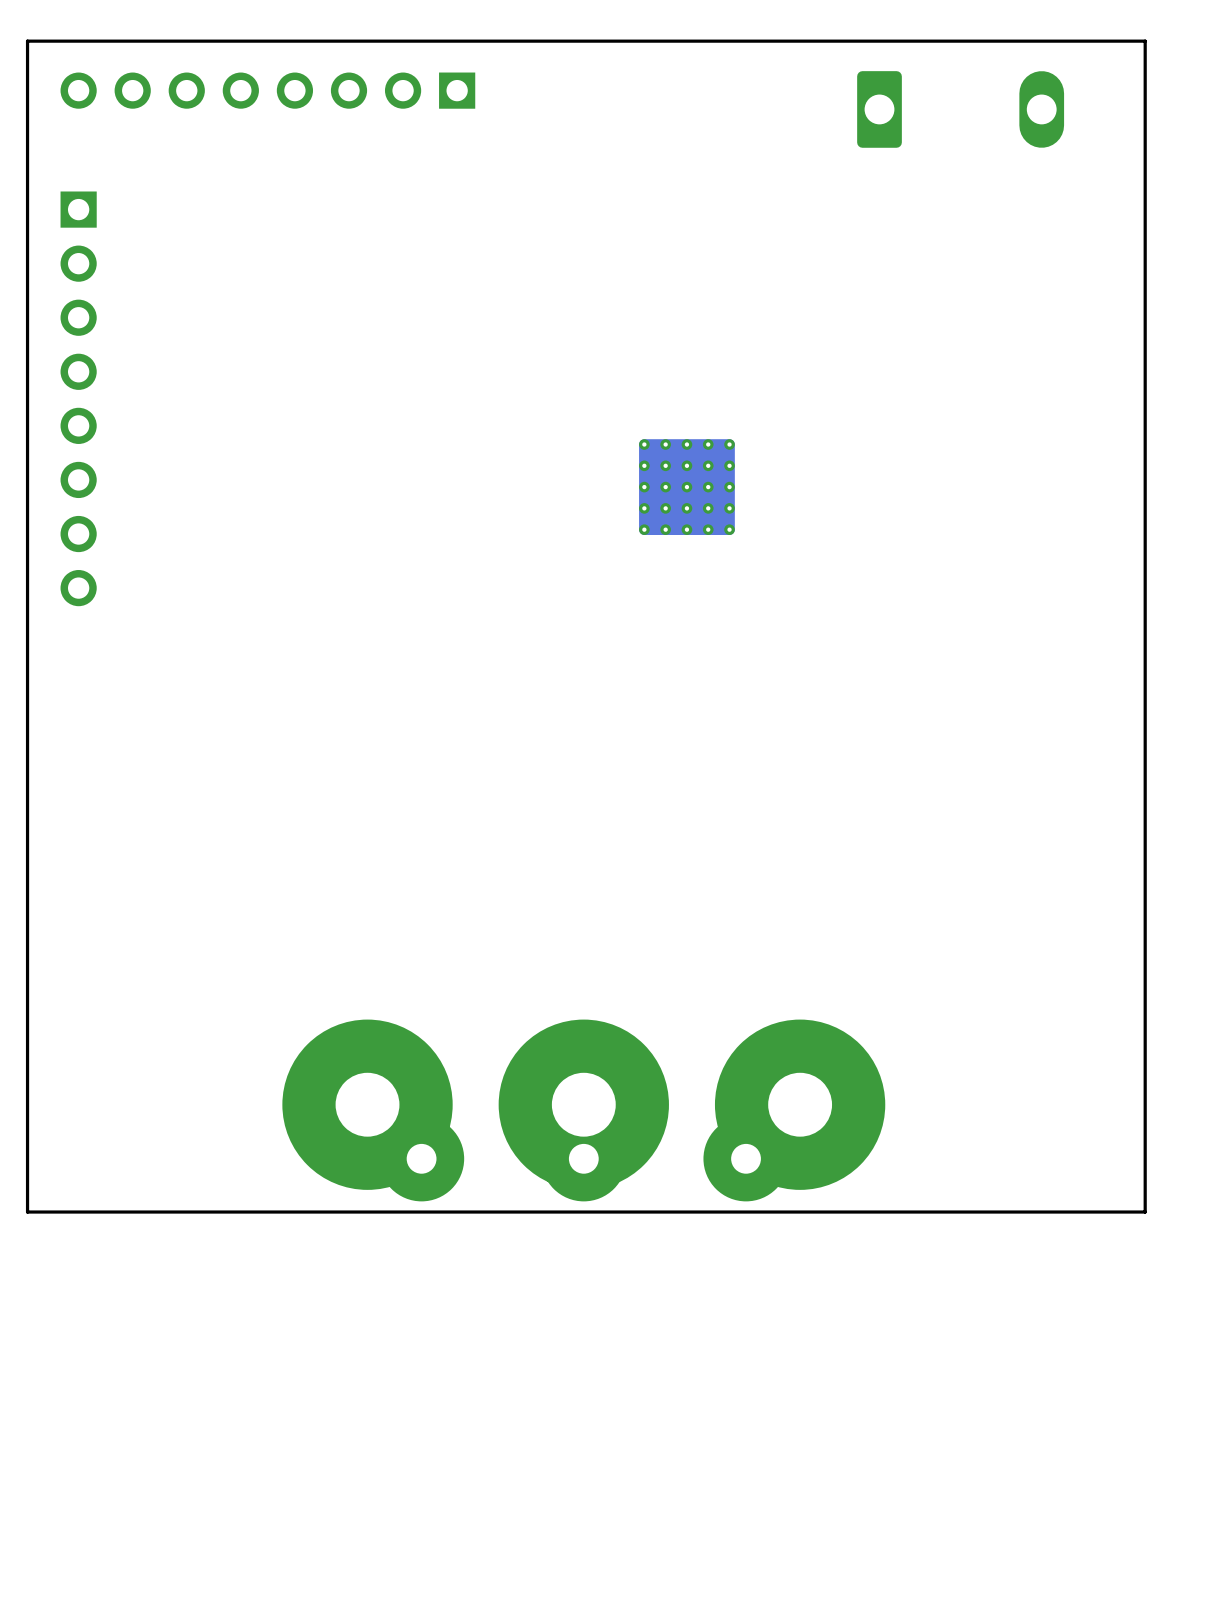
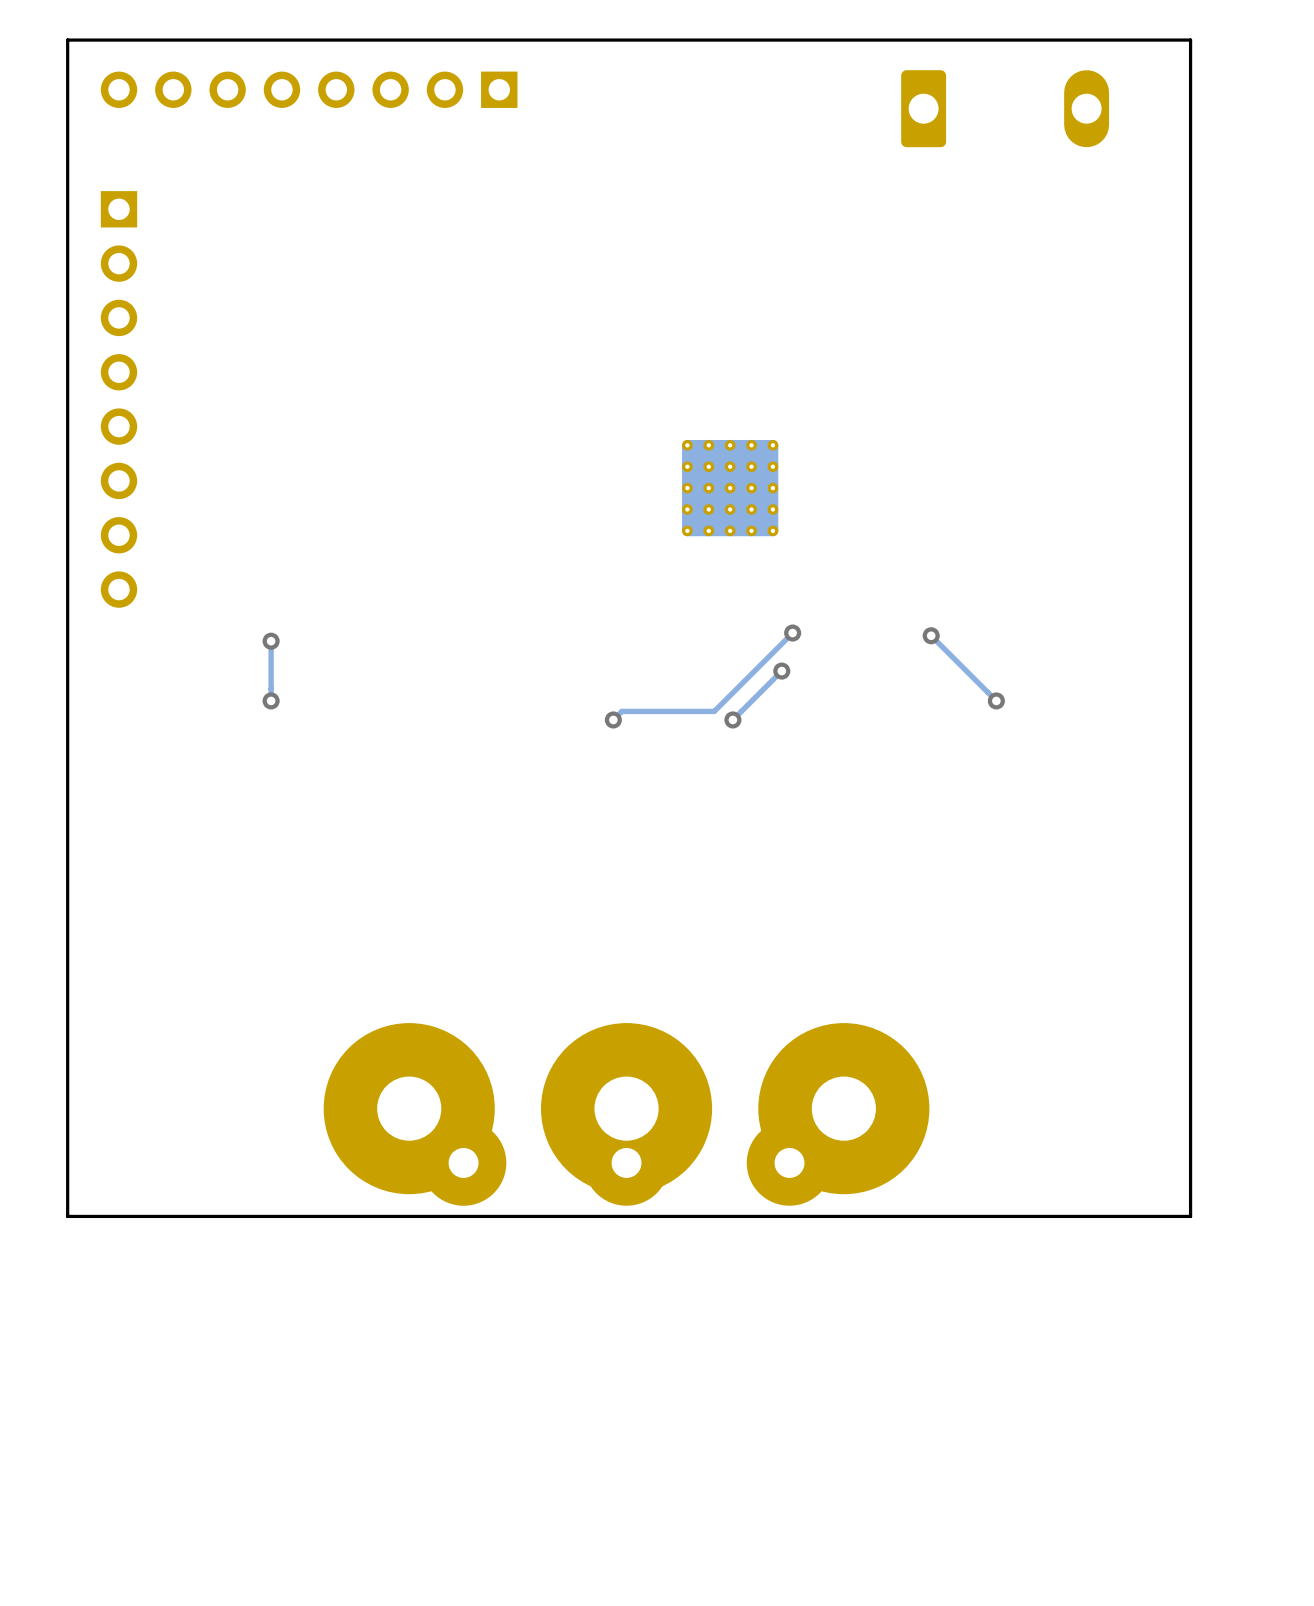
track: none -> (792, 633) (714, 711) (621, 711) (613, 719)
via: none -> (792, 633)
track: none -> (931, 635) (996, 700)
via: none -> (931, 635)
track: none -> (271, 641) (271, 700)
via: none -> (271, 641)
track: none -> (781, 671) (732, 719)
via: none -> (781, 671)
via: none -> (271, 700)
via: none -> (996, 700)
via: none -> (613, 719)
via: none -> (732, 719)

